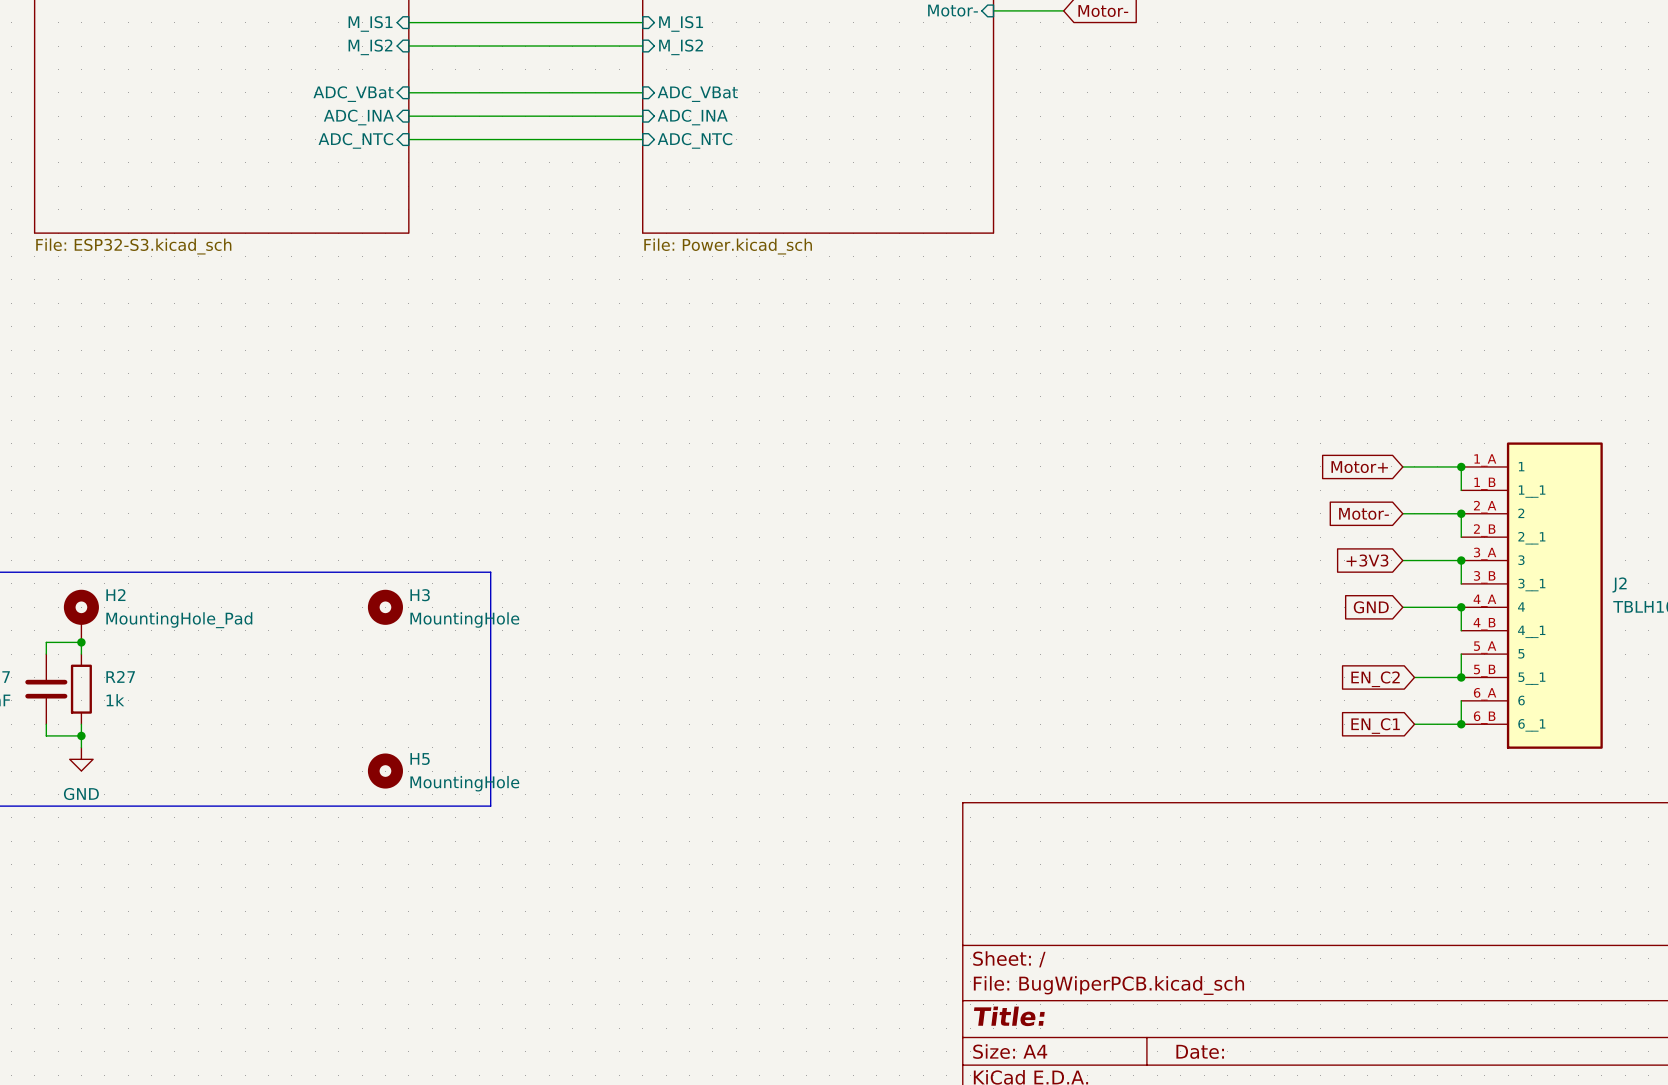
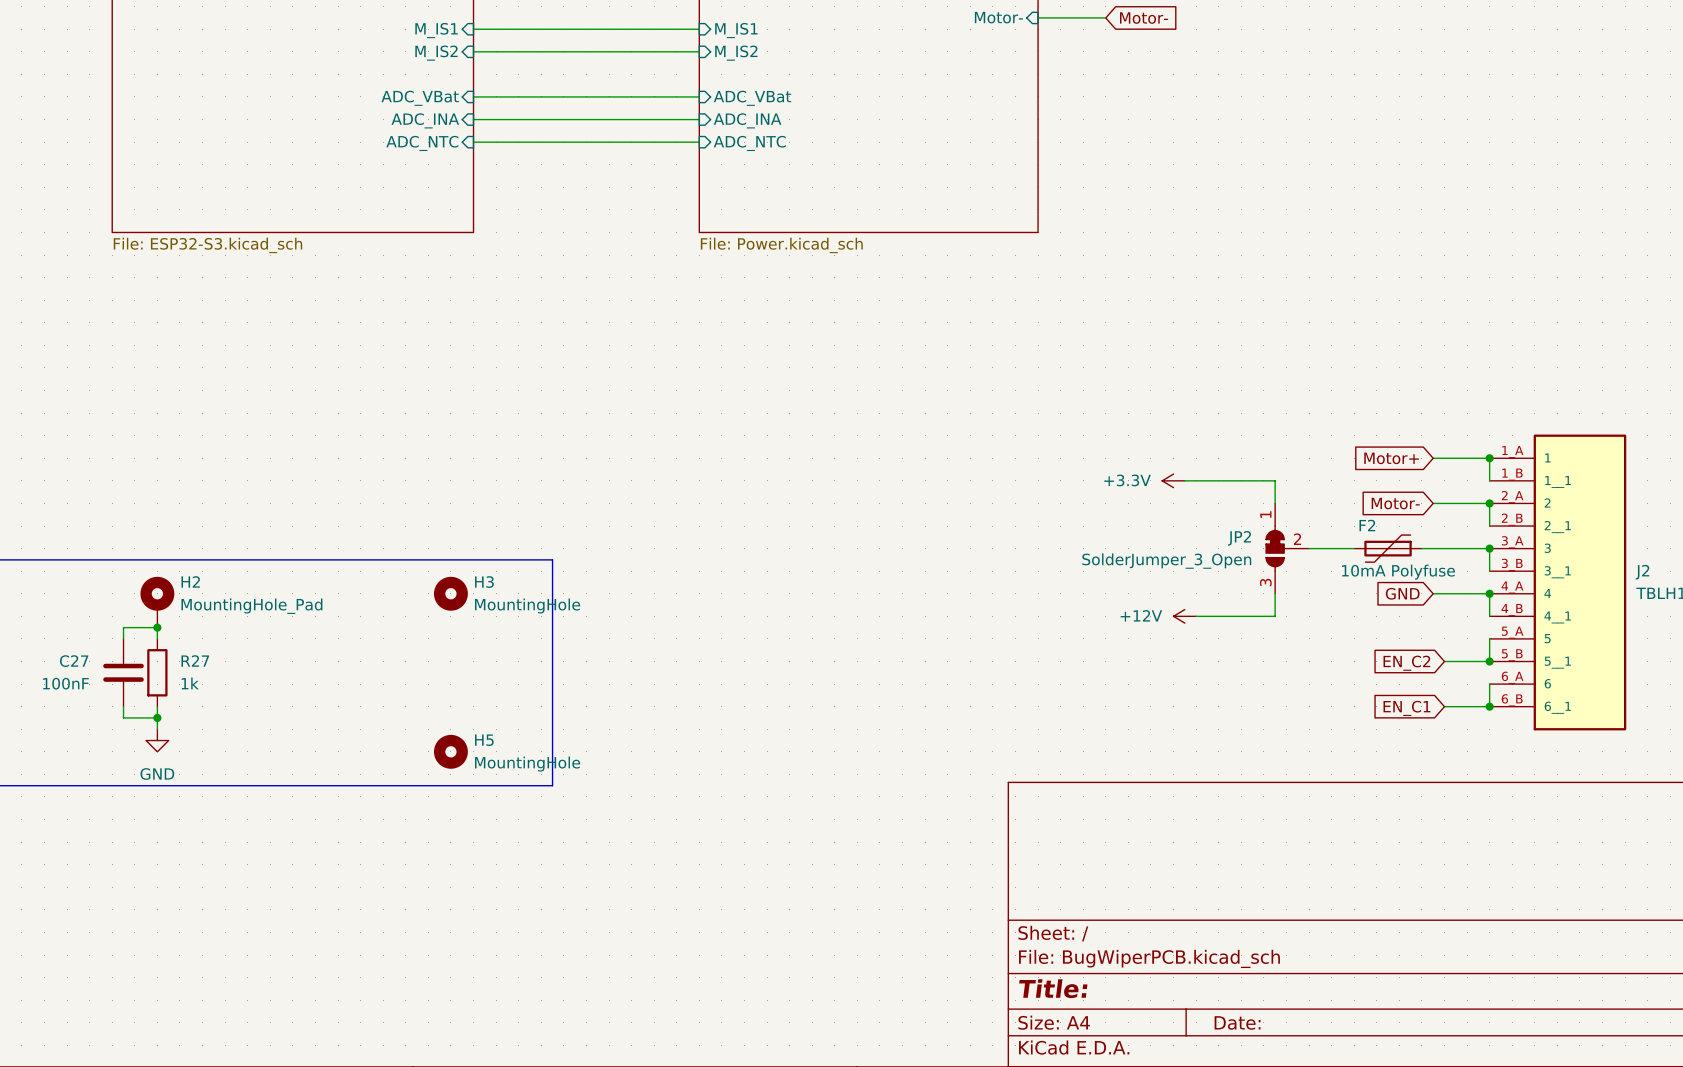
power symbol: none -> +3.3V (1173, 480)
wire: none -> (1184, 480) (1275, 480) (1275, 503)
JP2: none -> SolderJumper_3_Open (1287, 548)
wire: none -> (1309, 548) (1354, 548)
F2: none -> 10mA Polyfuse (1388, 548)
global label: +3V3 (1367, 560) -> none
wire: none -> (1421, 548) (1433, 548)
wire: none -> (1275, 593) (1275, 616) (1196, 616)
power symbol: none -> +12V (1184, 616)

